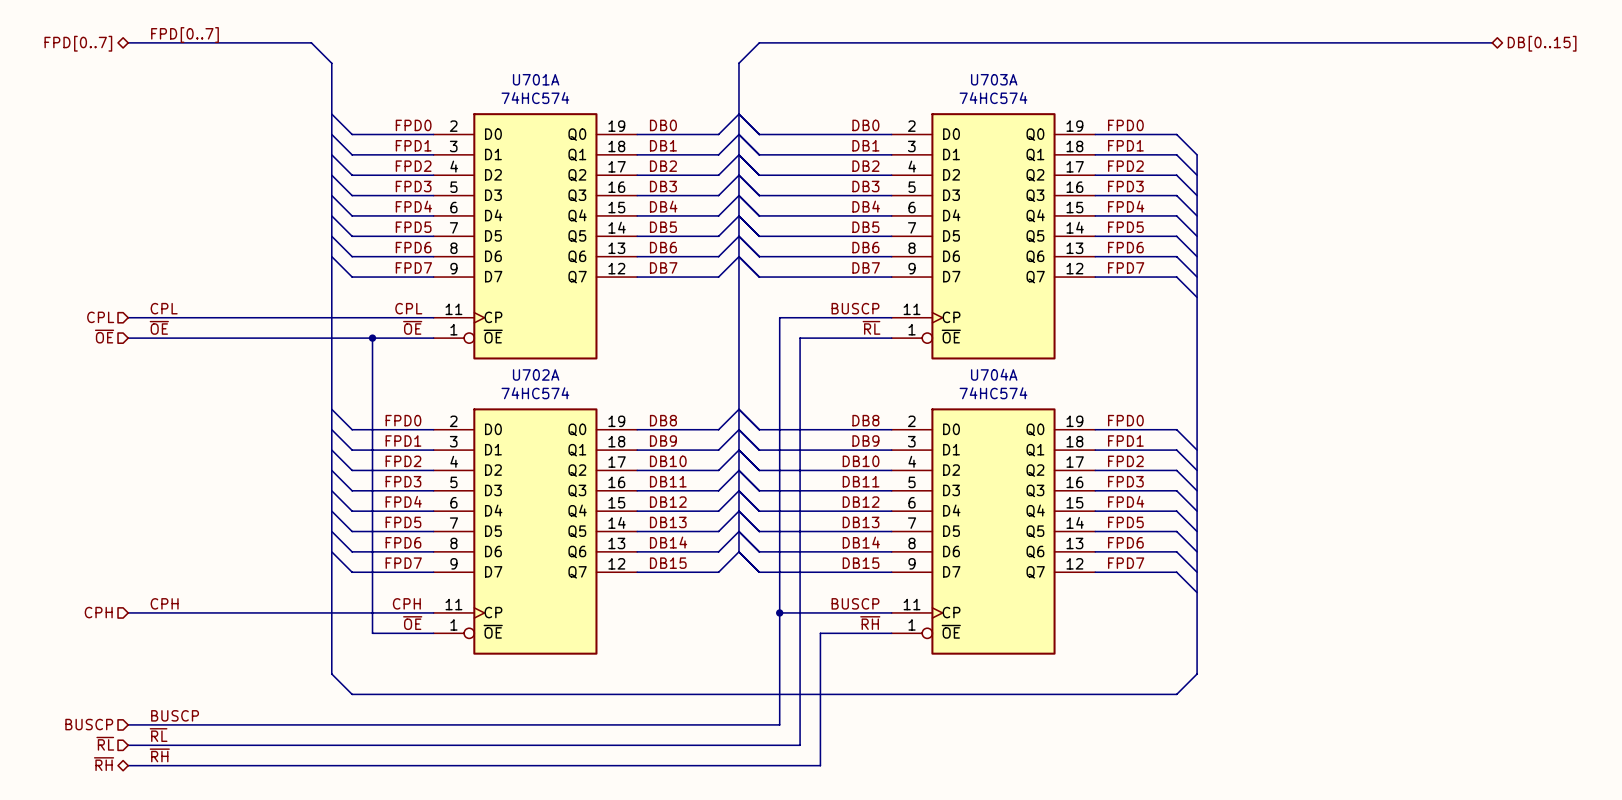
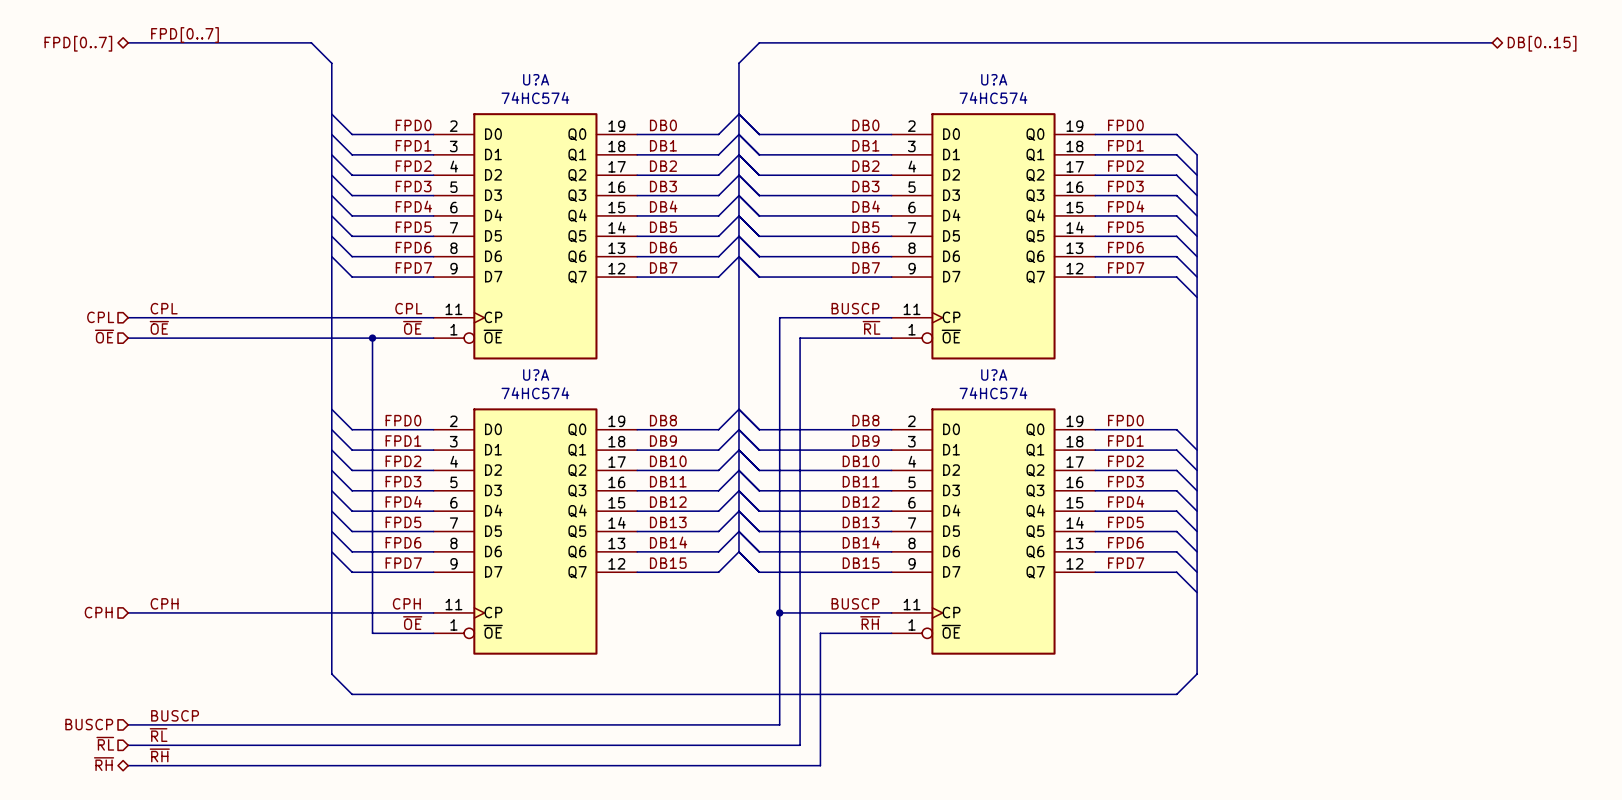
U701A name: U701A (536, 79) -> U?A (536, 79)
U703A name: U703A (994, 79) -> U?A (994, 79)
U702A name: U702A (536, 374) -> U?A (536, 374)
U704A name: U704A (994, 374) -> U?A (994, 374)

